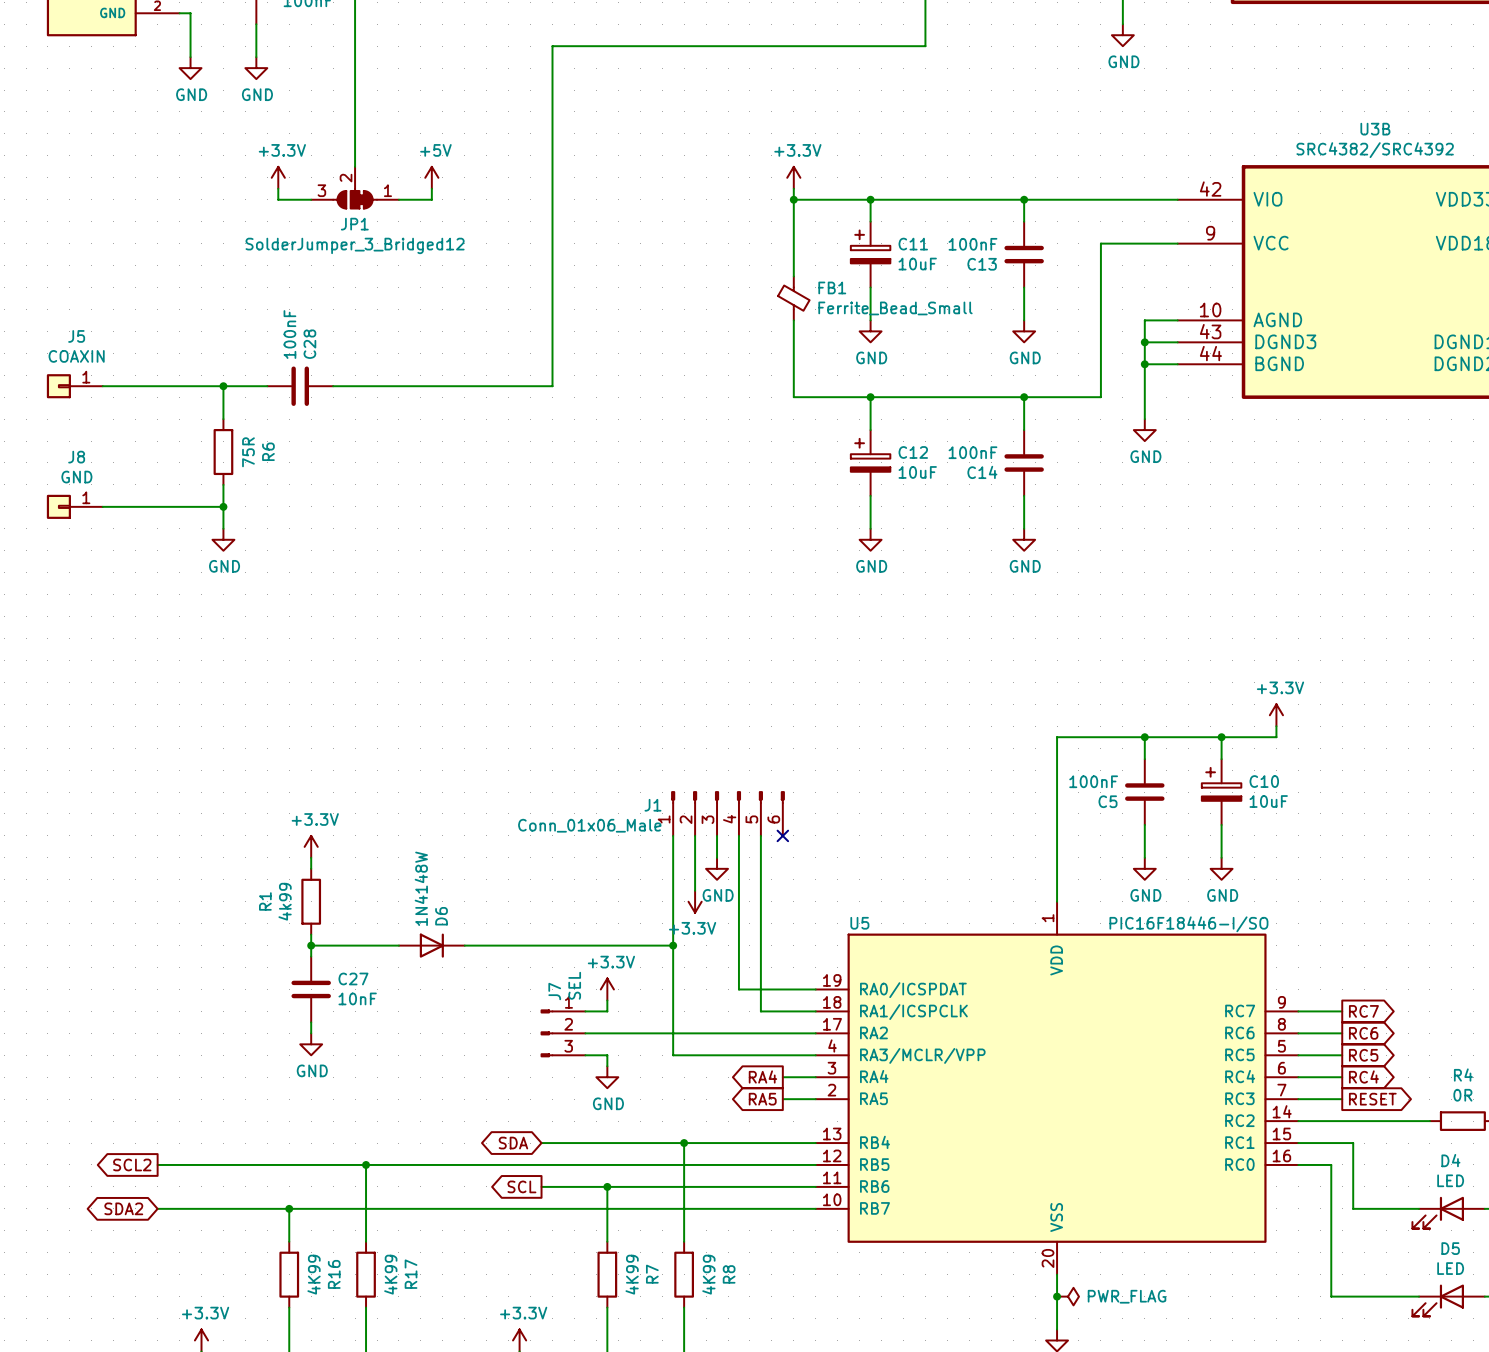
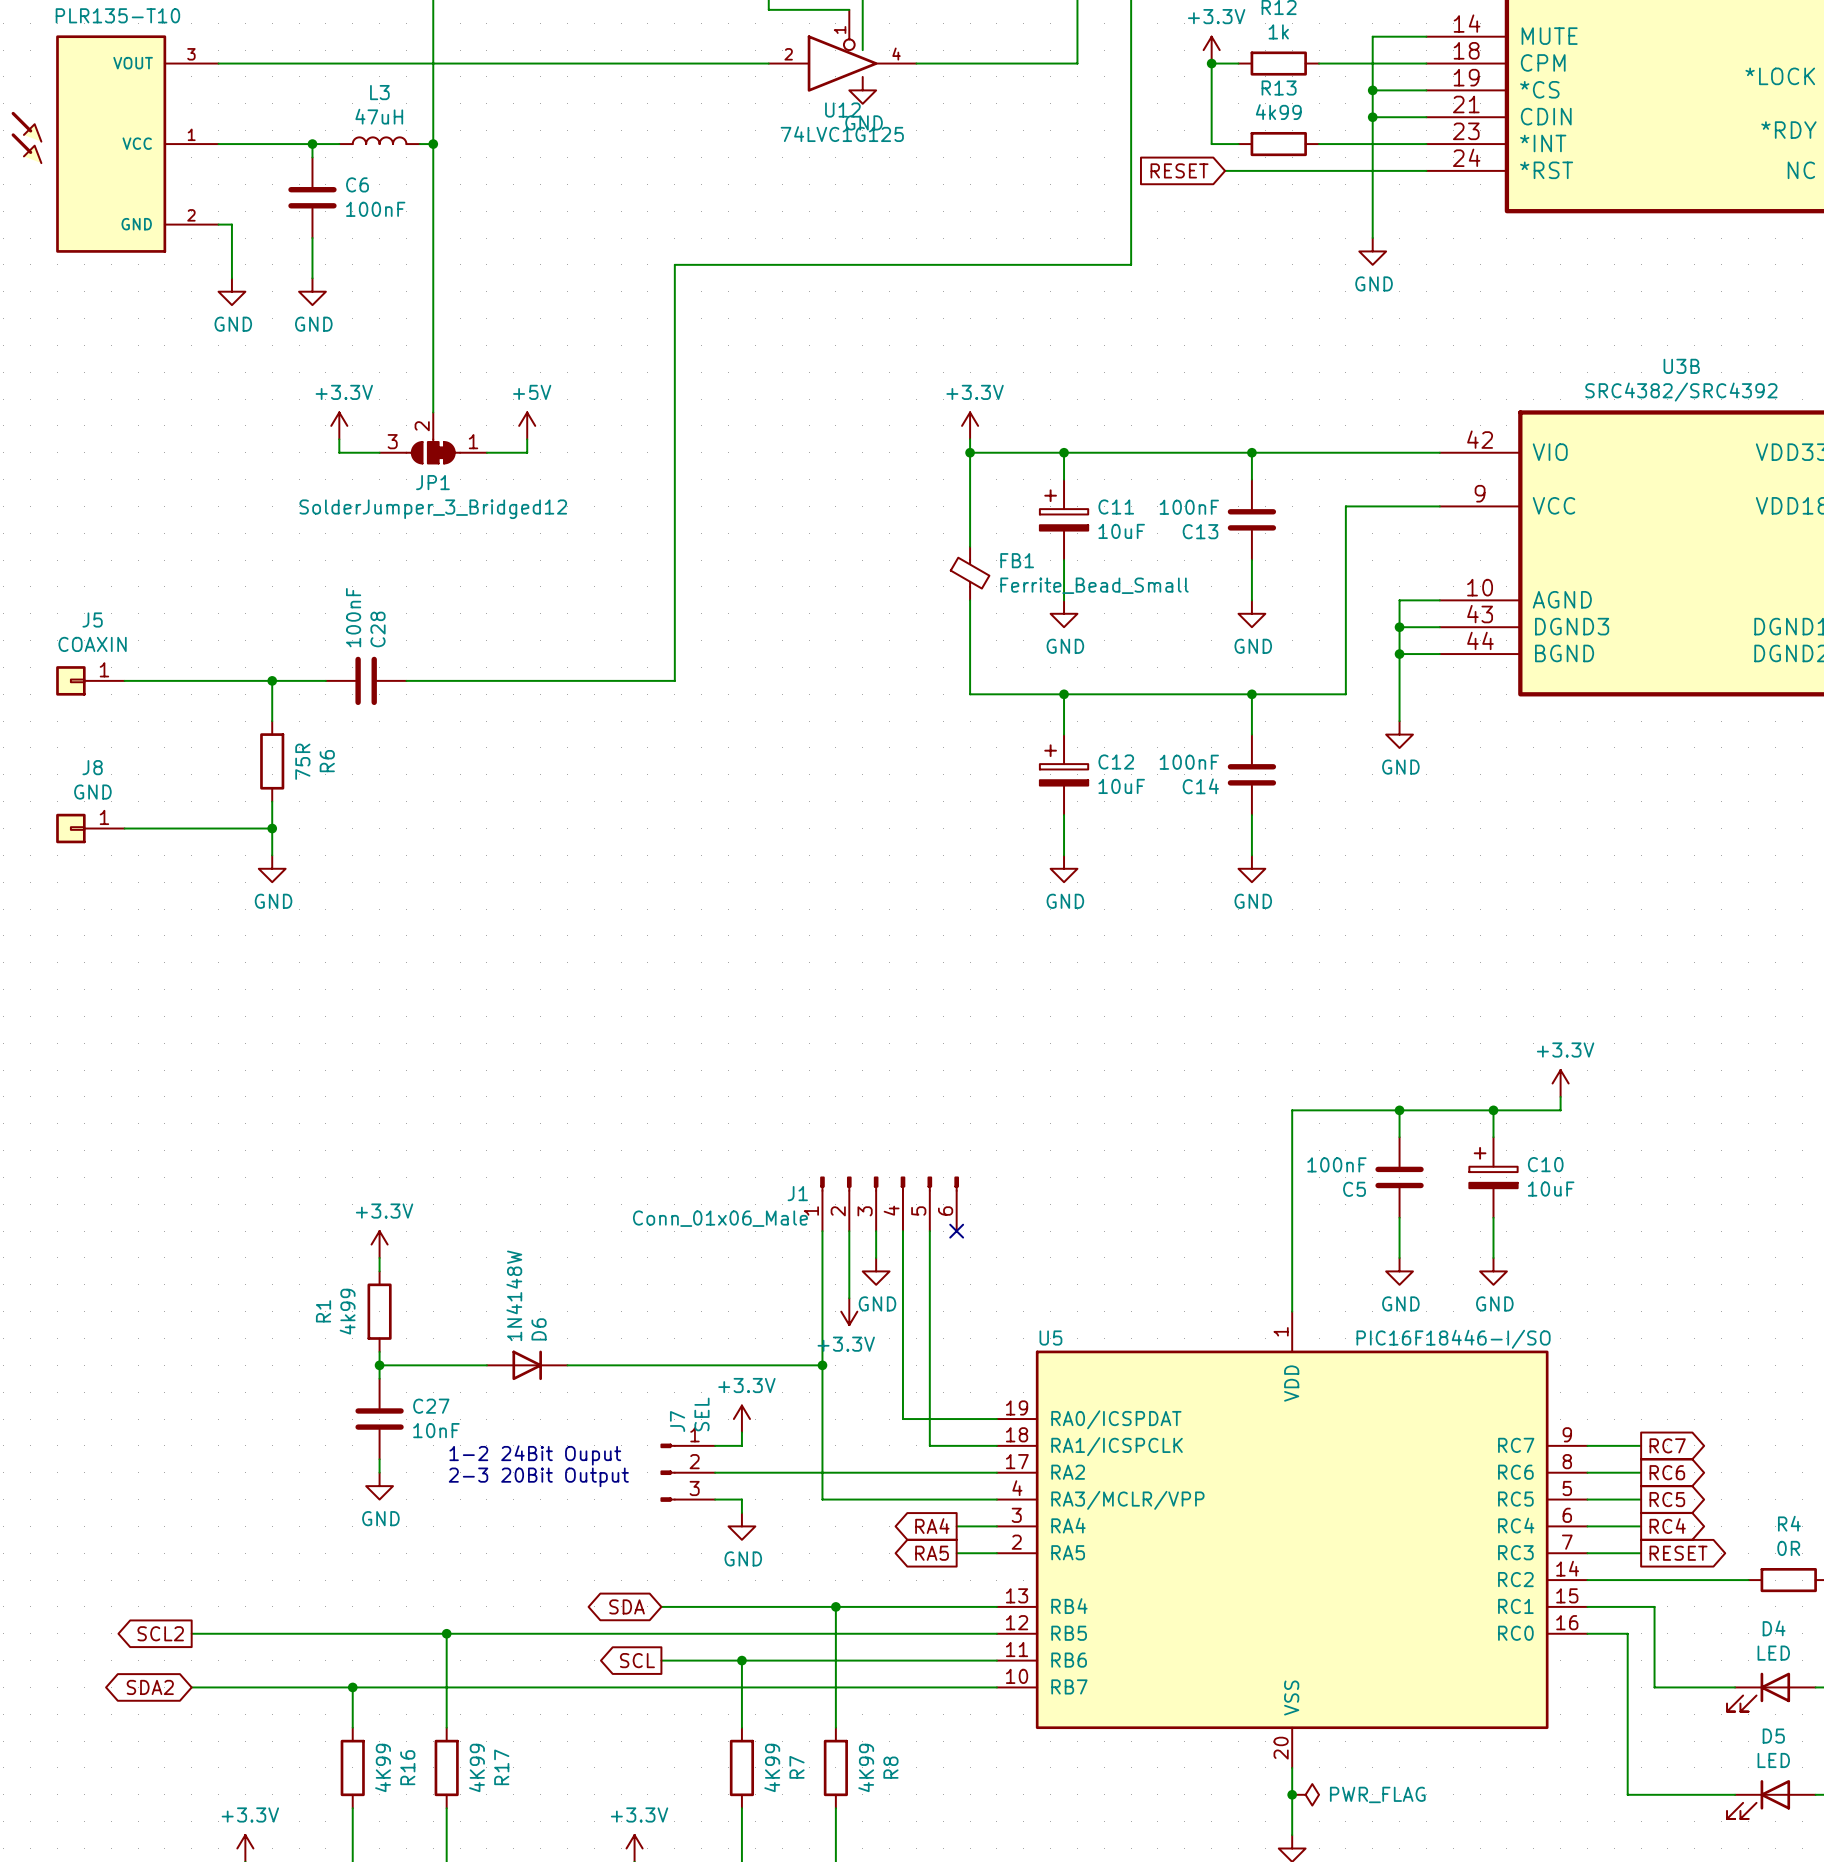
text: none -> 1-2 24Bit Ouput (535, 1455)
text: none -> 2-3 20Bit Output (538, 1477)

